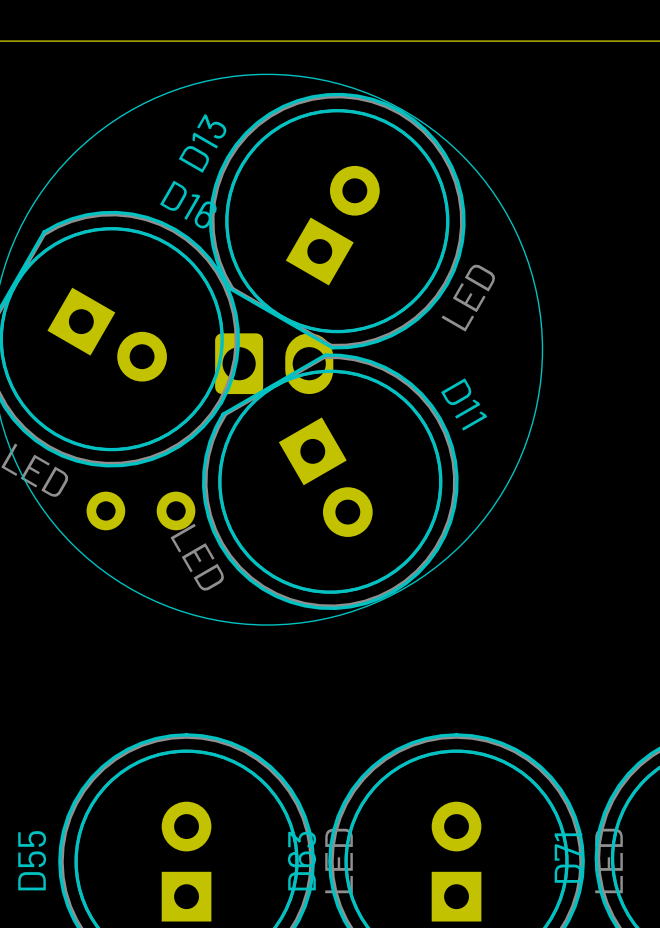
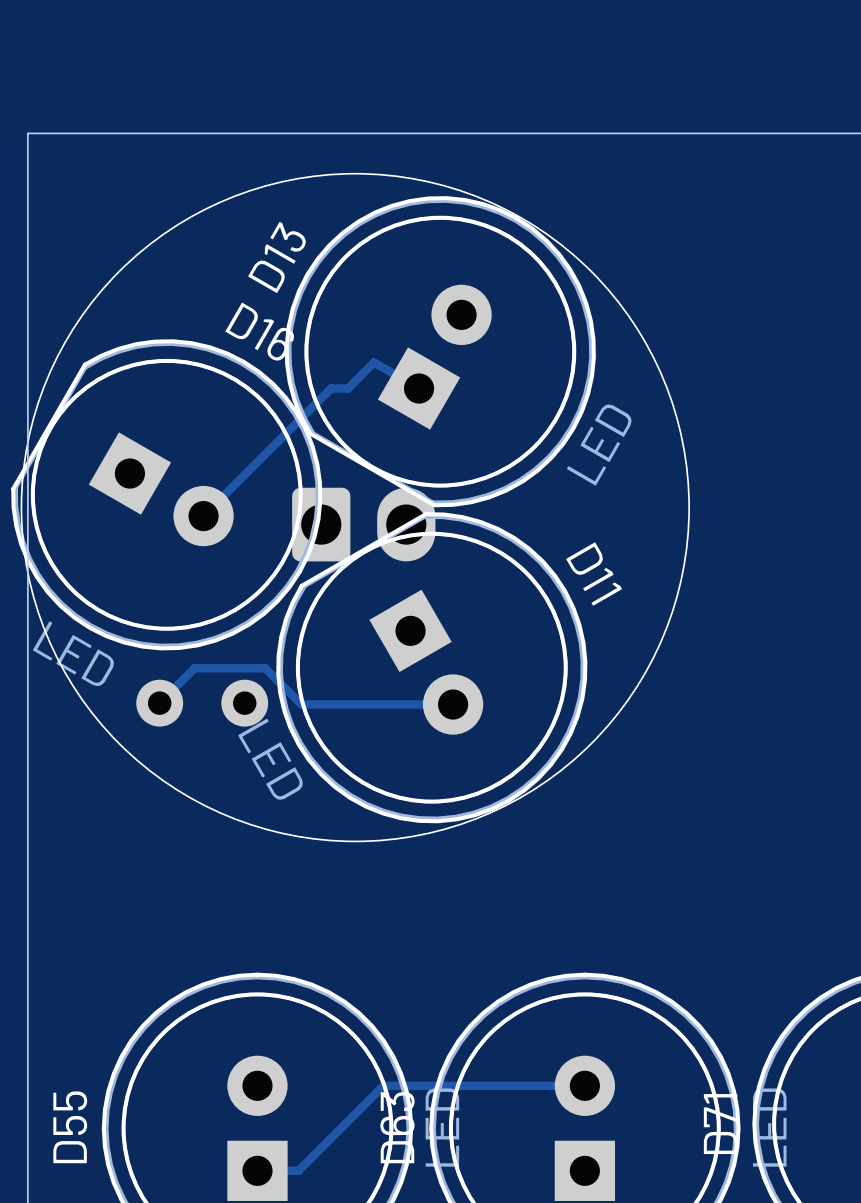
track: none -> (419, 388) (374, 362) (348, 388) (331, 388) (203, 516)
track: none -> (159, 703) (194, 668) (265, 668) (301, 704) (453, 704)
track: none -> (584, 1085) (383, 1085) (298, 1170) (257, 1170)

